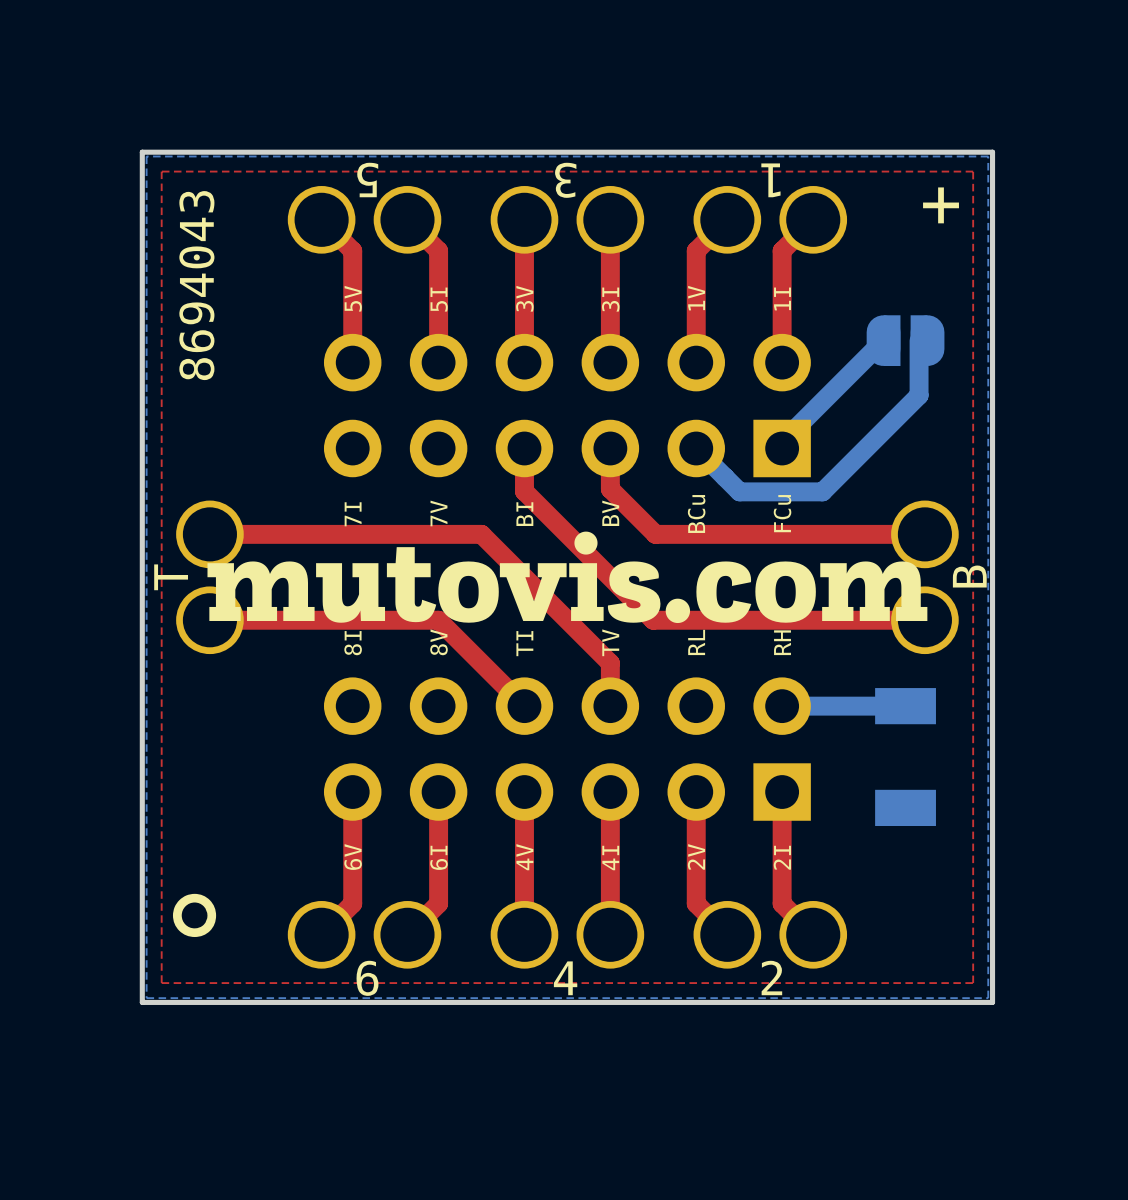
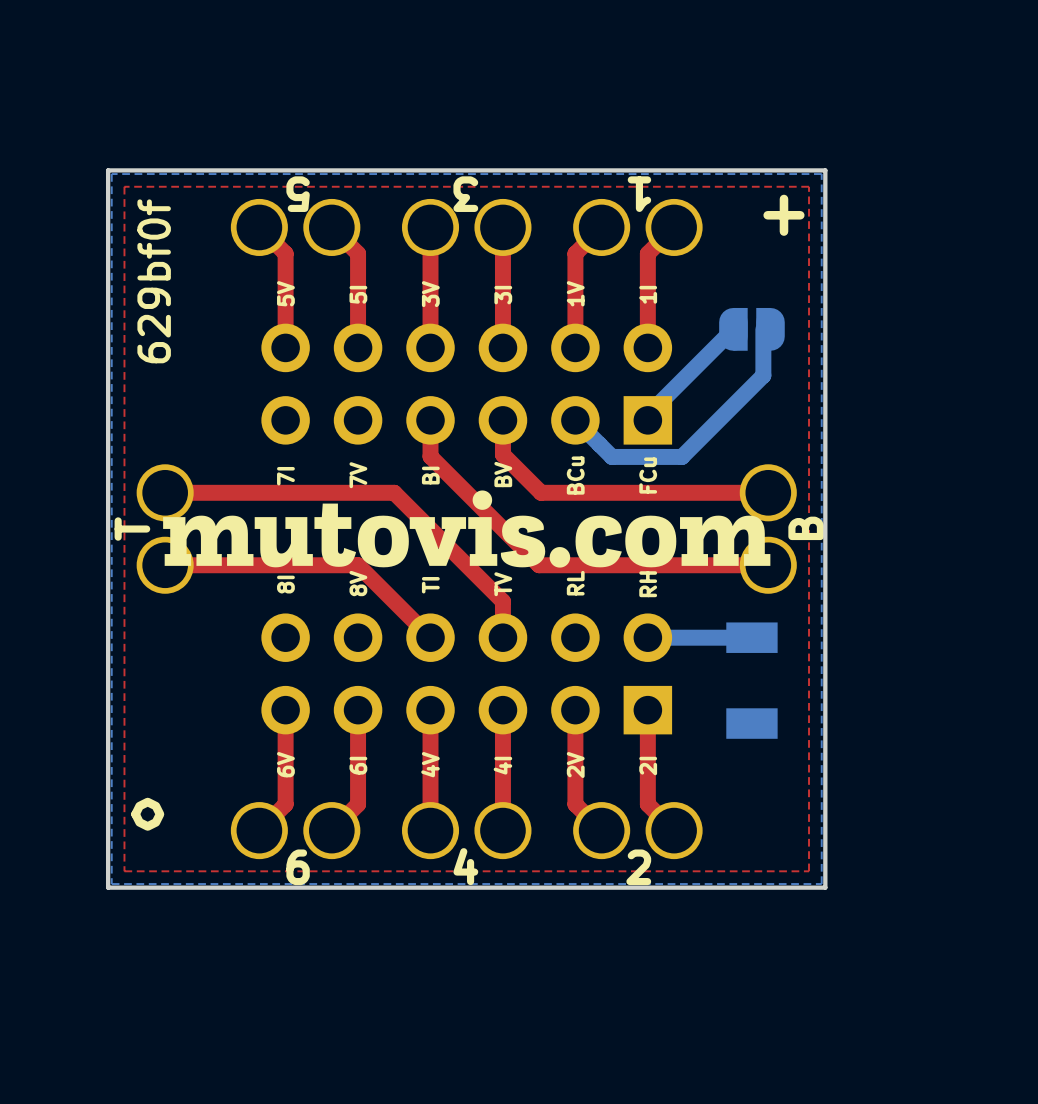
text: 8694043 (196, 285) -> 629bf0f (154, 281)

